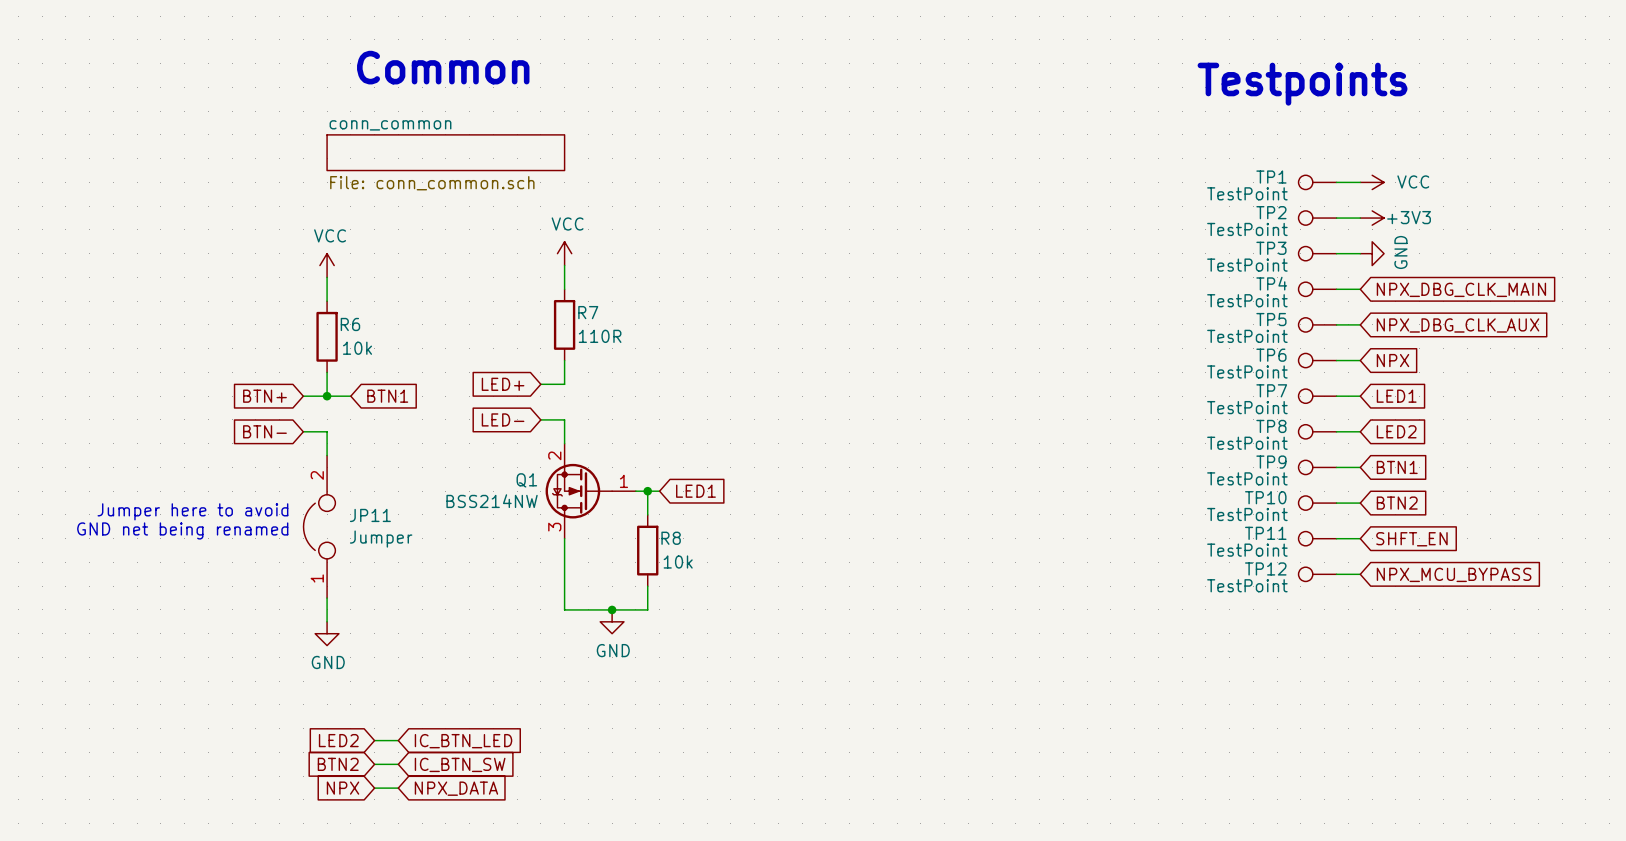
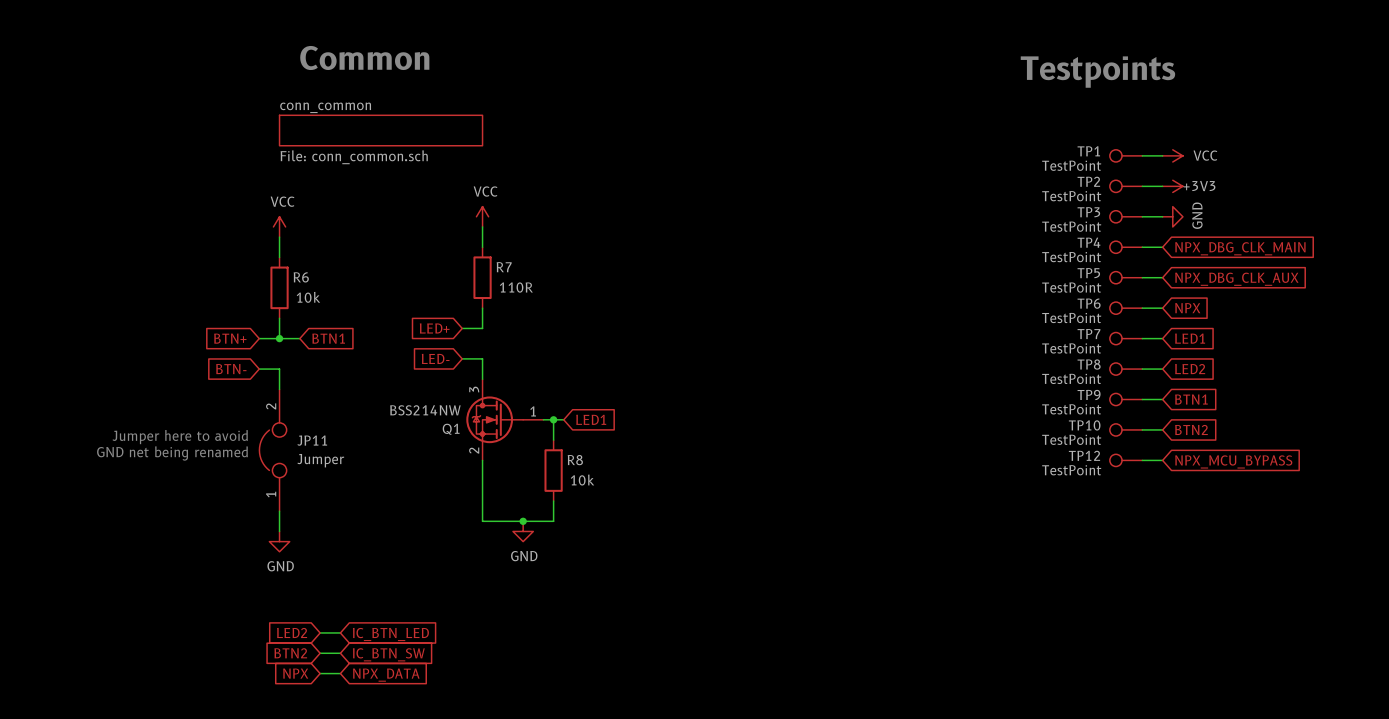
Q1 flip: as is (578, 491) -> up-down (494, 419)
TP11 name: TP11 (1265, 533) -> TP12 (1084, 455)
global label: SHFT_EN (1411, 539) -> NPX_MCU_BYPASS (1233, 461)
TP12: TestPoint (1317, 574) -> none
wire: (1336, 574) (1360, 574) -> none
global label: NPX_MCU_BYPASS (1454, 574) -> none

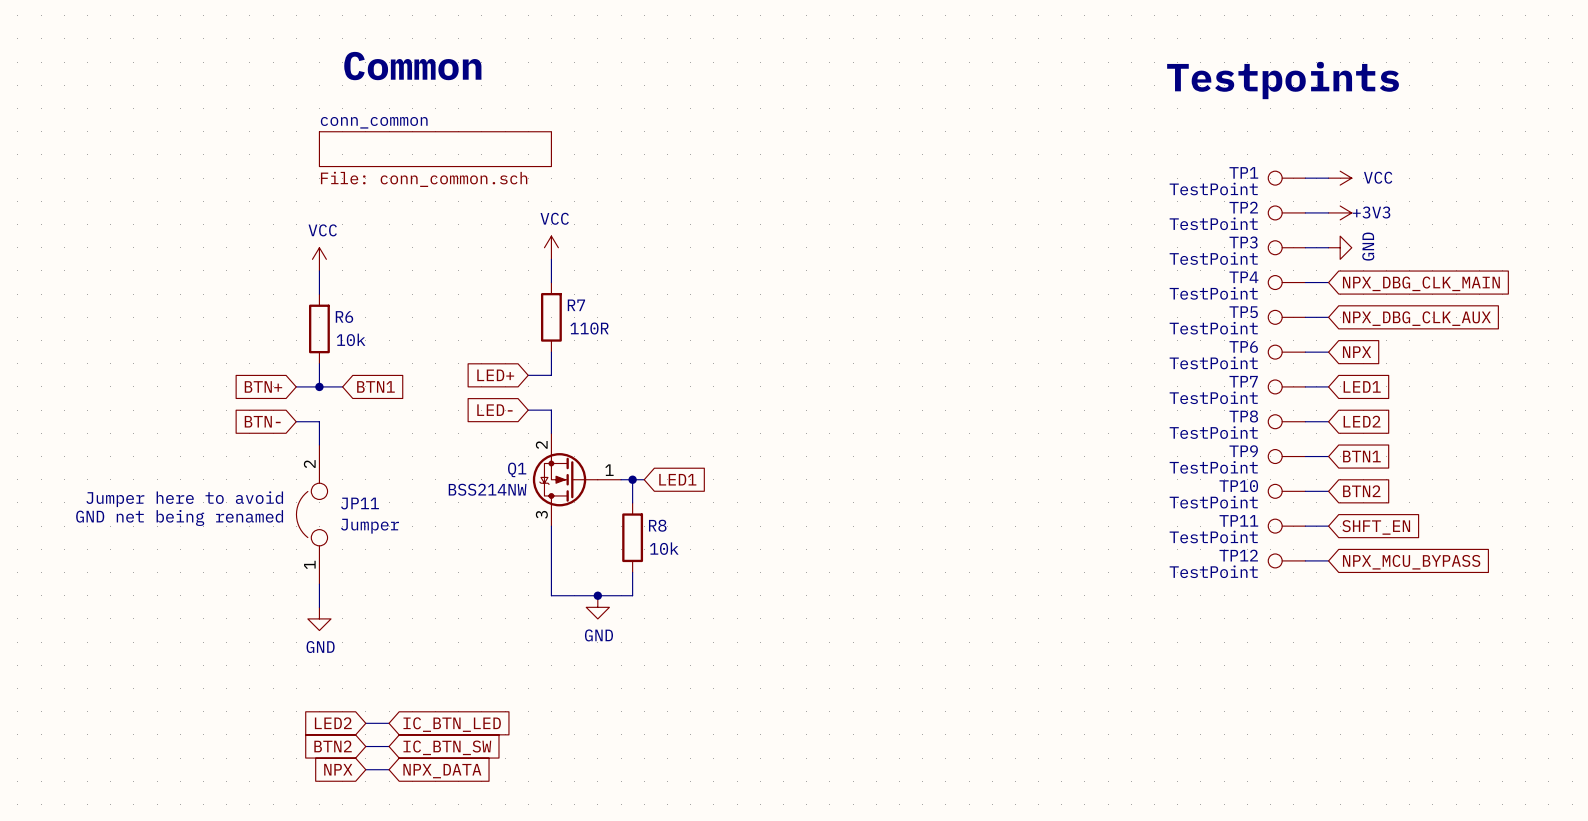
Q1 flip: as is (494, 419) -> up-down (565, 479)
TP12 name: TP12 (1084, 455) -> TP11 (1238, 520)
global label: NPX_MCU_BYPASS (1233, 461) -> SHFT_EN (1376, 527)
TP12: none -> TestPoint (1286, 560)
wire: none -> (1305, 560) (1328, 560)
global label: none -> NPX_MCU_BYPASS (1411, 562)

